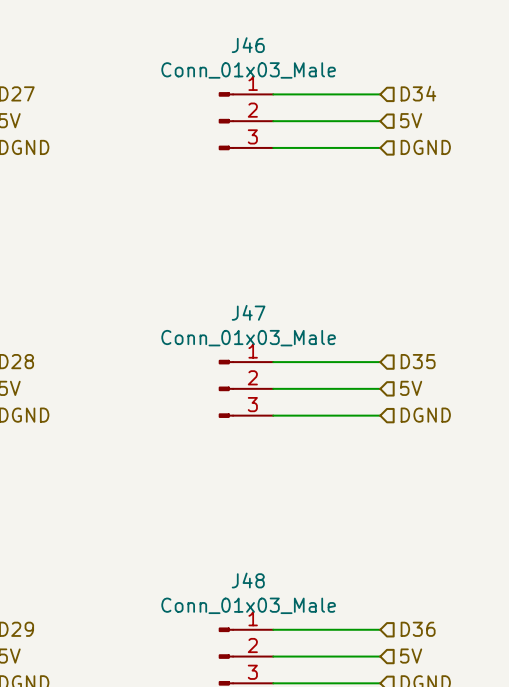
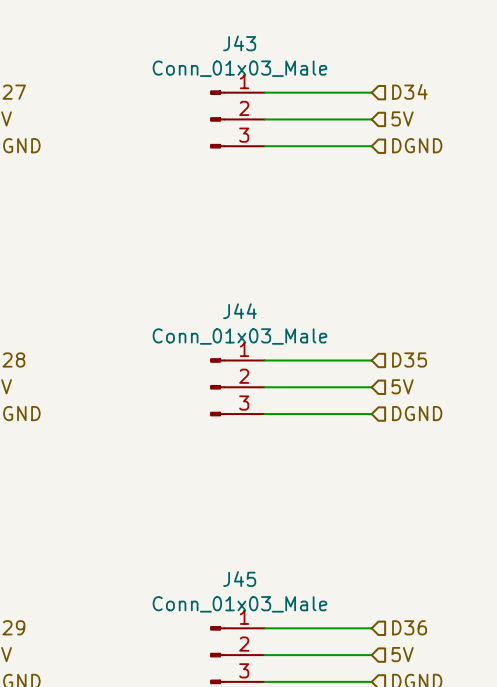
J46 name: J46 (248, 45) -> J43 (239, 43)
J47 name: J47 (248, 312) -> J44 (239, 311)
J48 name: J48 (248, 580) -> J45 (239, 579)

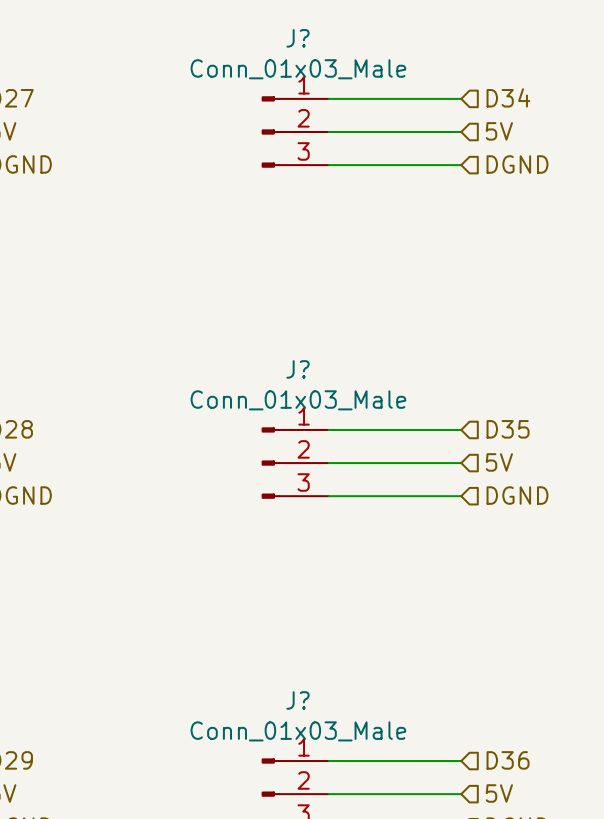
J43 name: J43 (239, 43) -> J? (297, 38)
J44 name: J44 (239, 311) -> J? (297, 369)
J45 name: J45 (239, 579) -> J? (297, 700)

